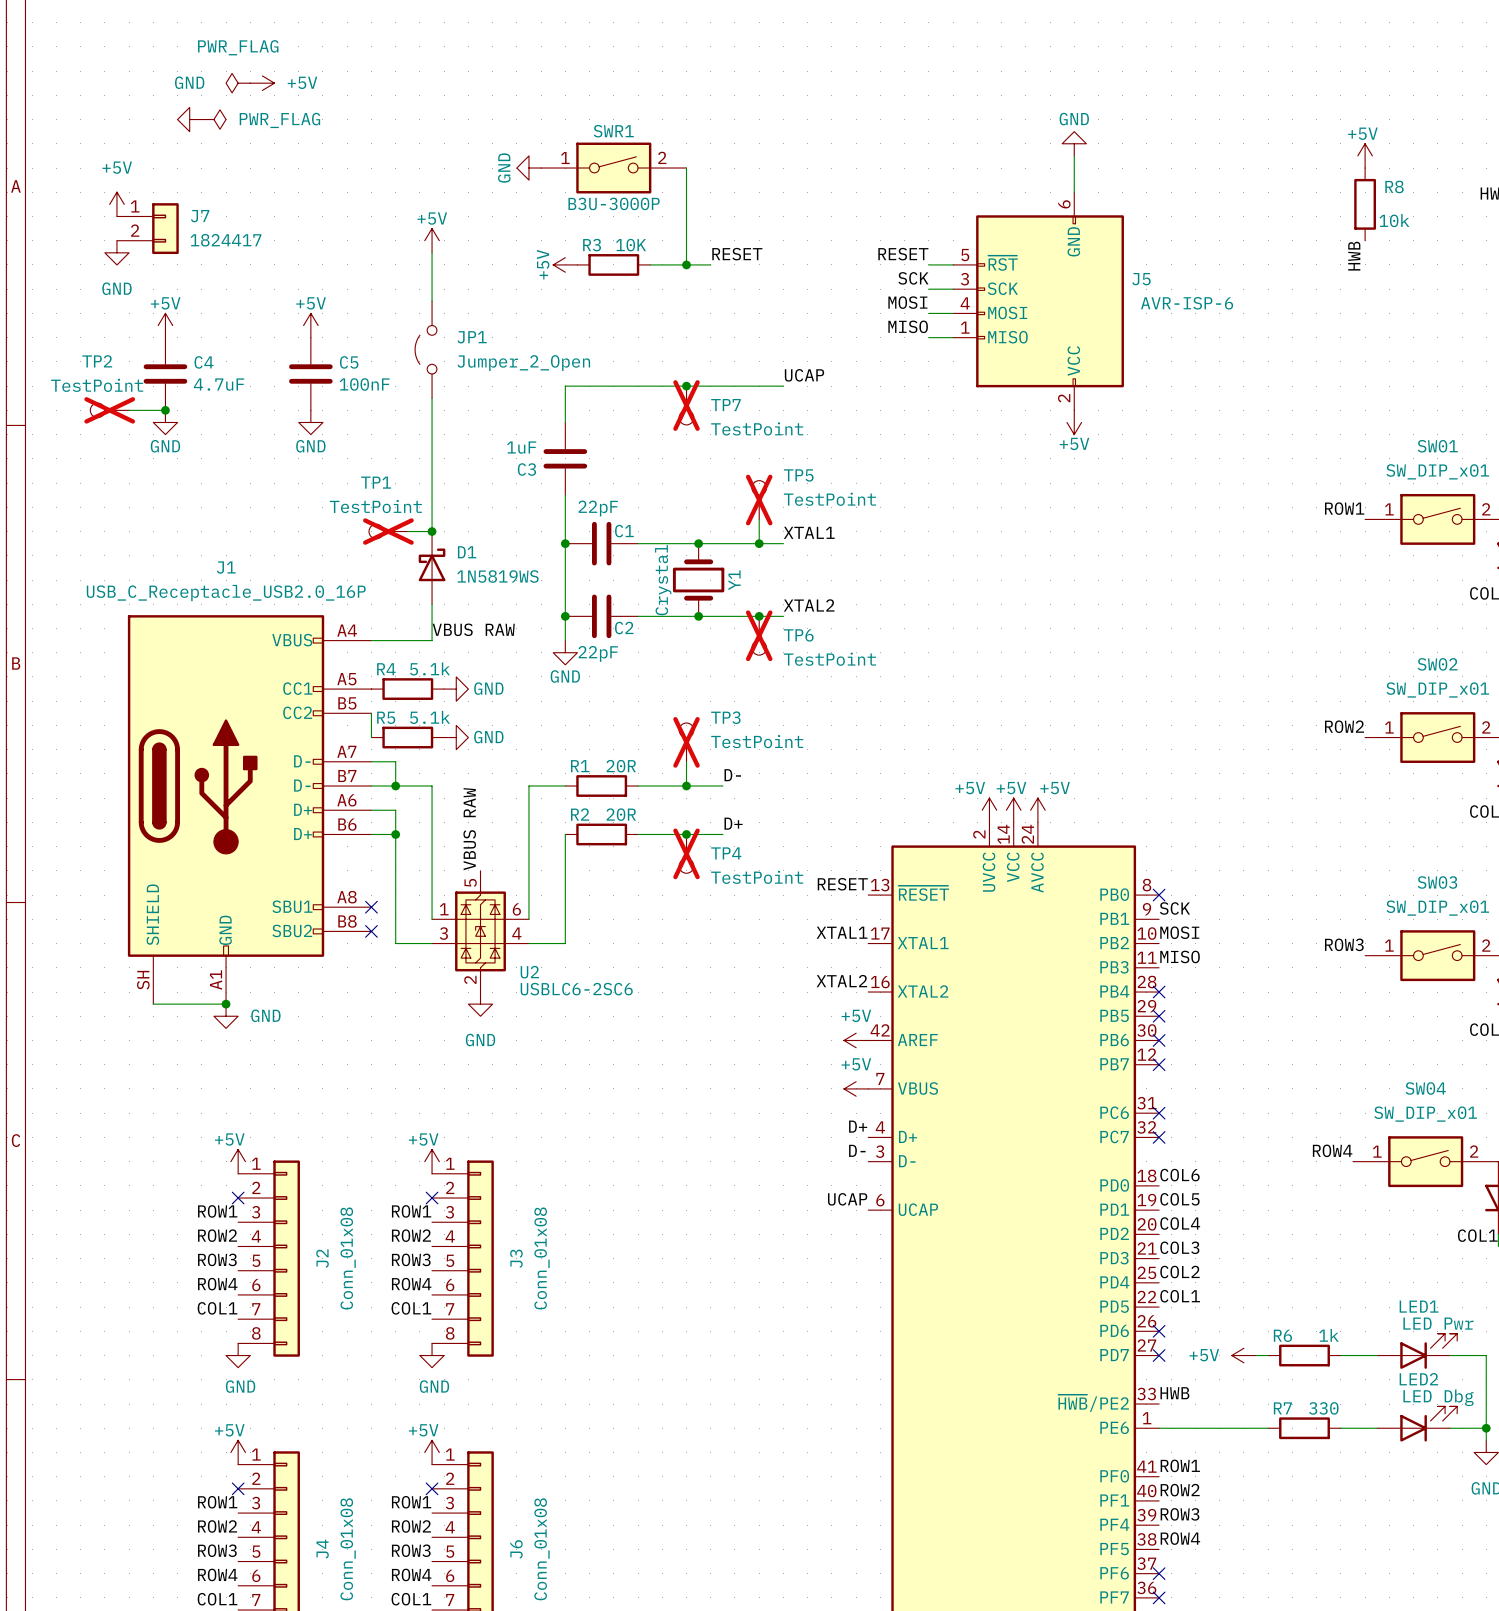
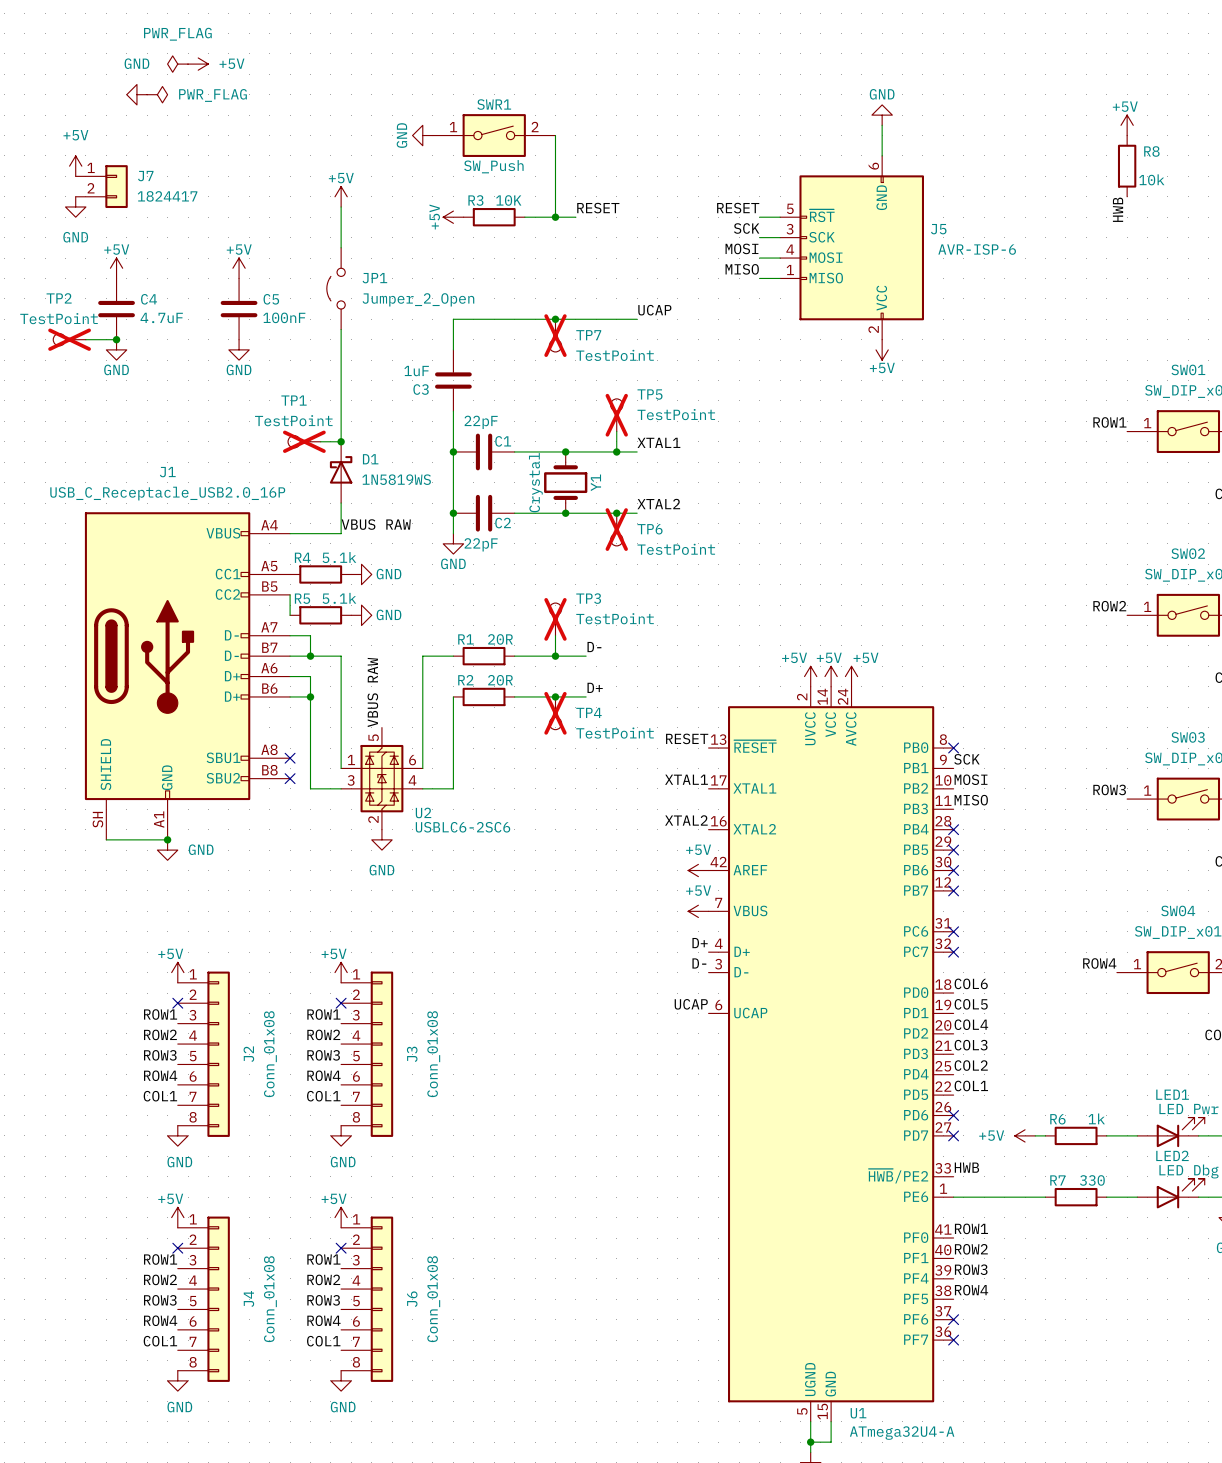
SWR1 value: B3U-3000P (614, 203) -> SW_Push (493, 166)

